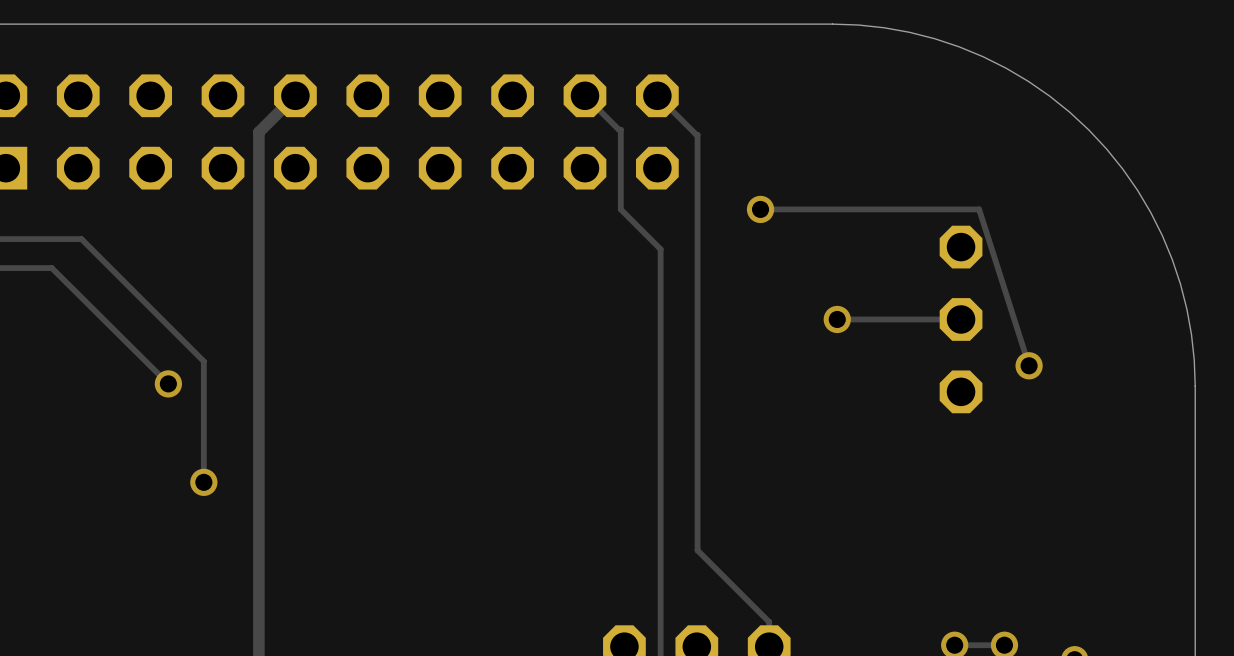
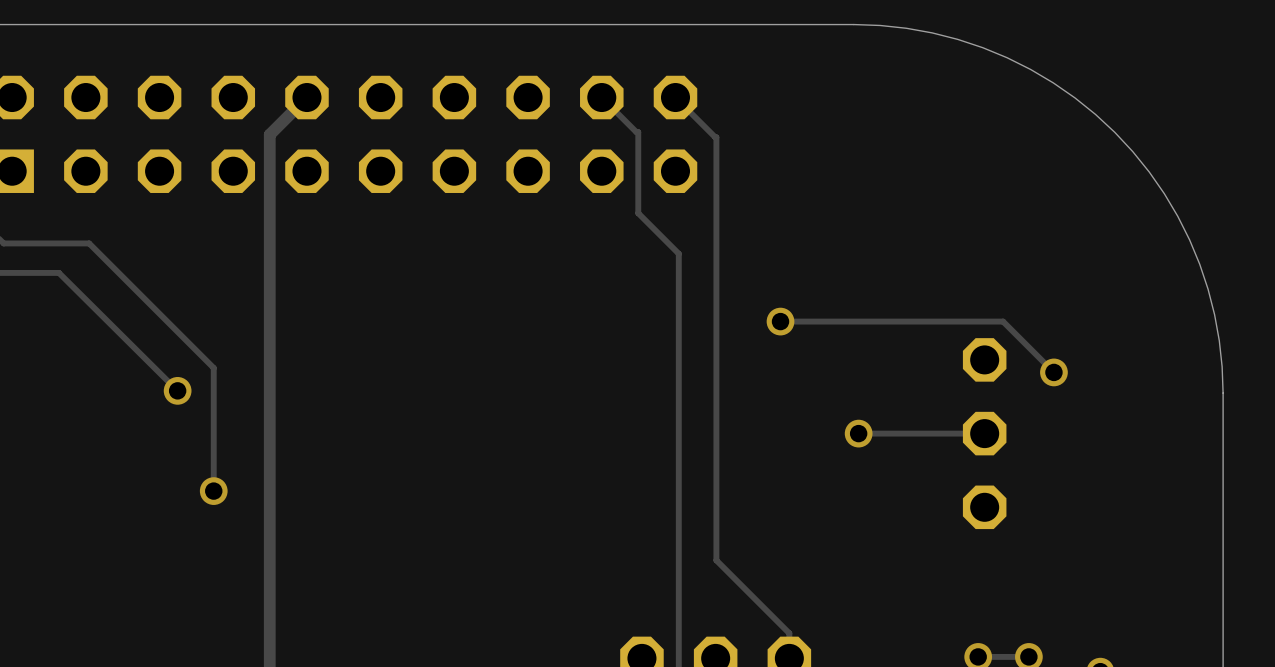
track: (760, 209) (979, 209) (1029, 365) -> (780, 321) (1003, 321) (1053, 372)
via: (760, 209) -> none
via: none -> (780, 321)
via: (837, 319) -> none
track: (961, 319) (837, 319) -> (984, 433) (858, 433)
part position: (961, 319) -> (984, 433)
via: none -> (858, 433)

